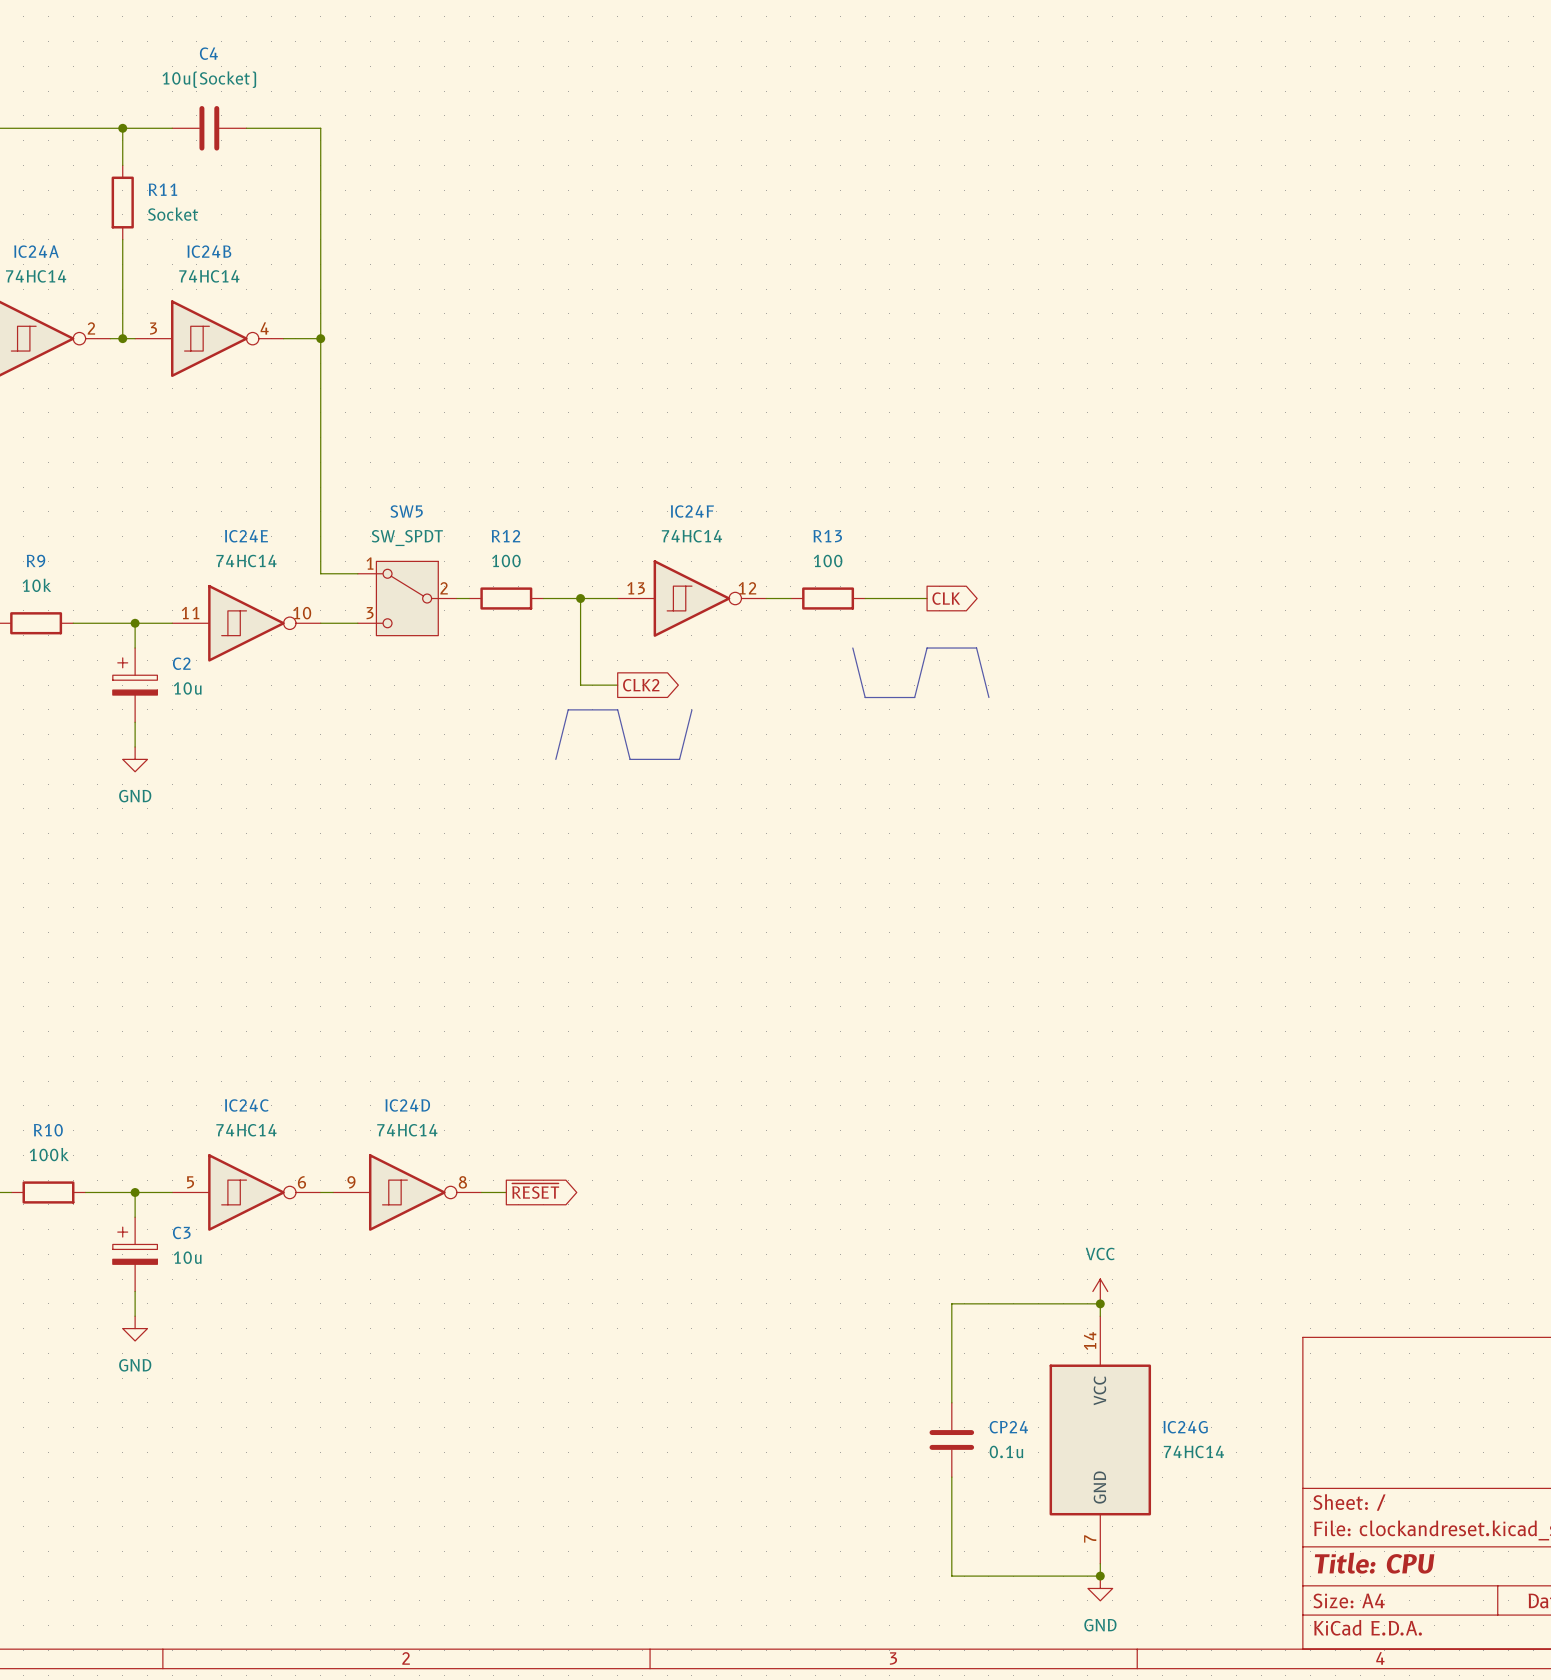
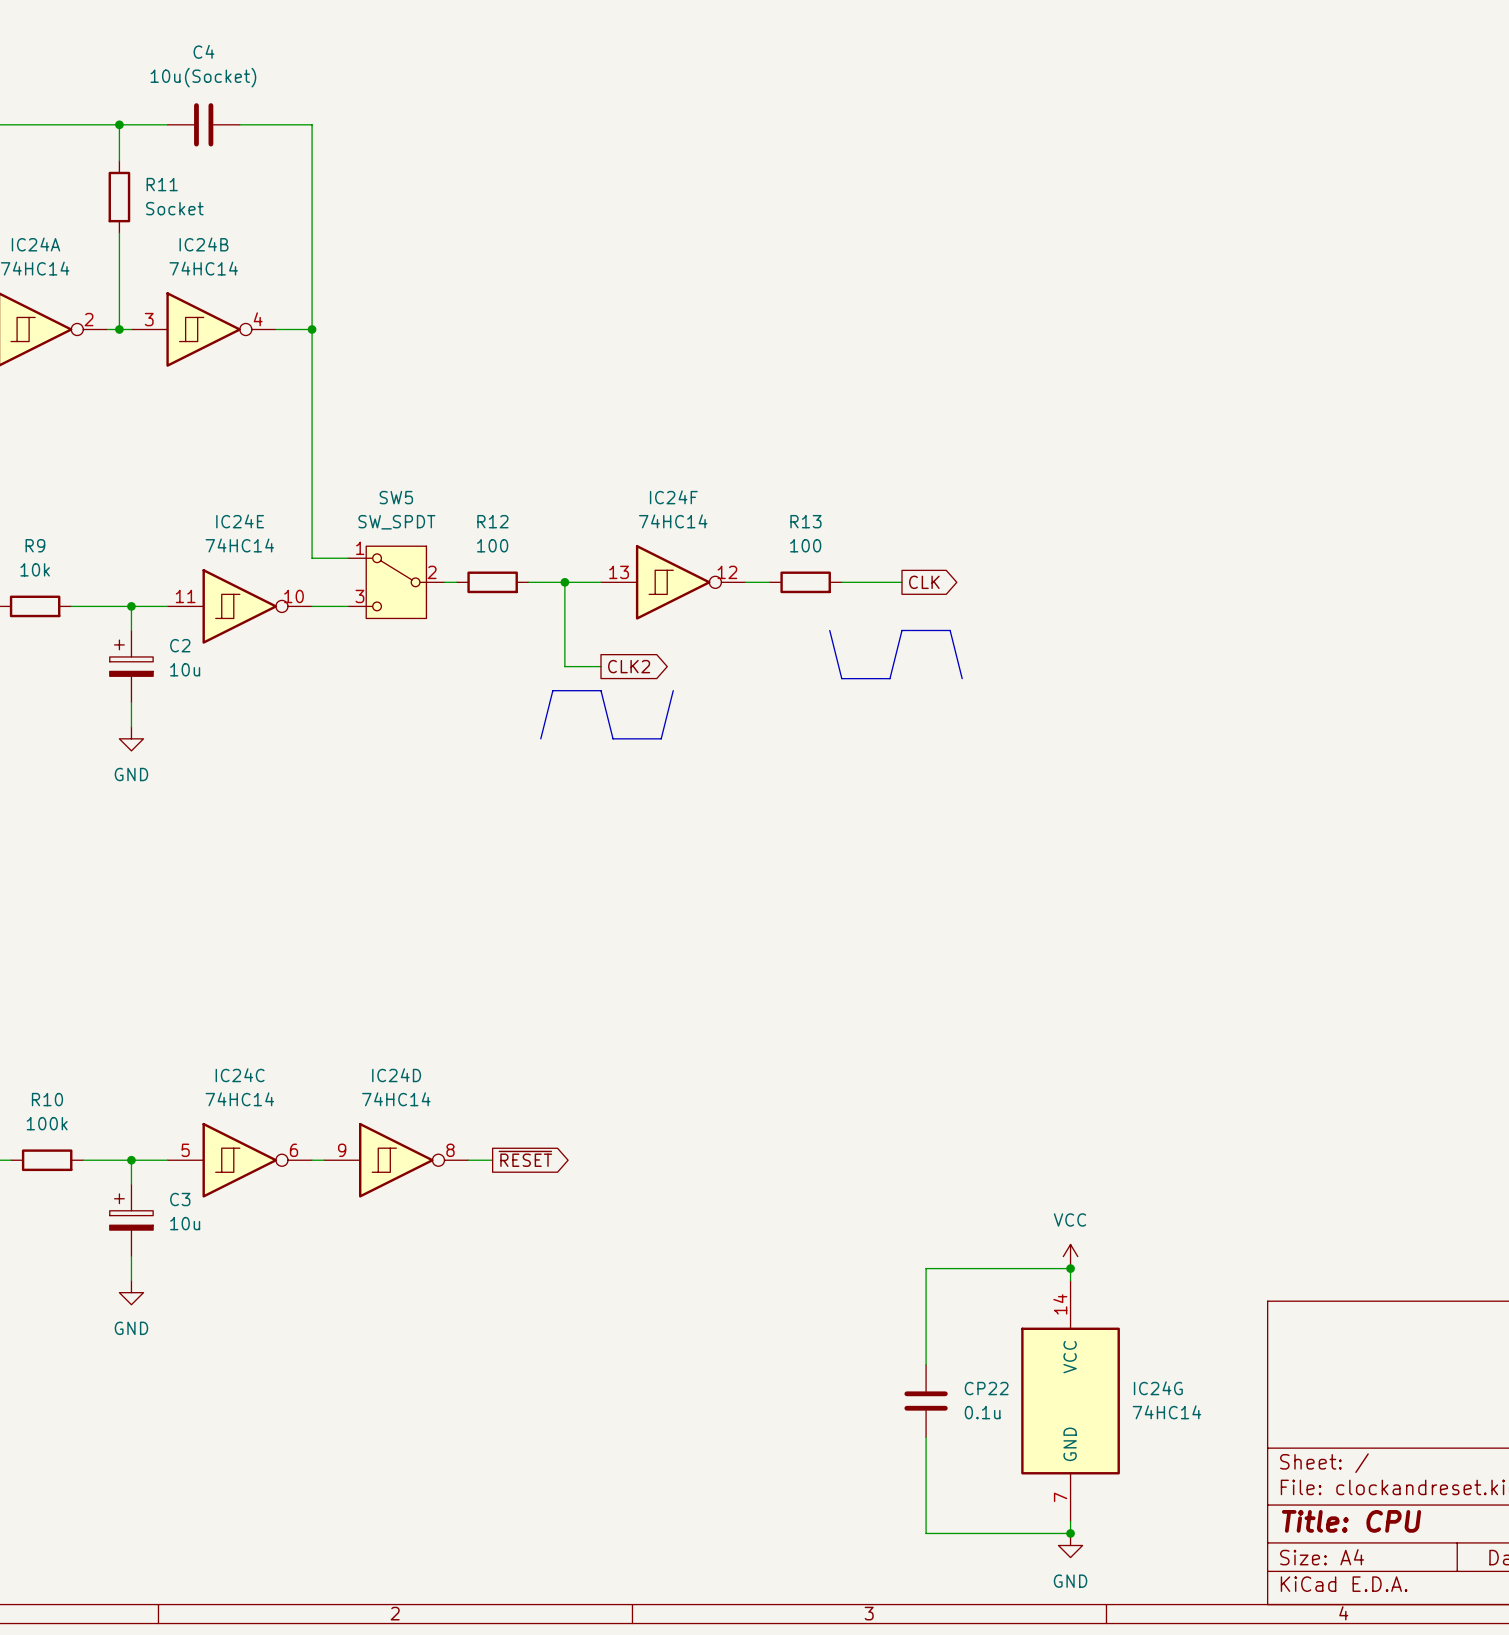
CP24 name: CP24 (1008, 1427) -> CP22 (986, 1388)

